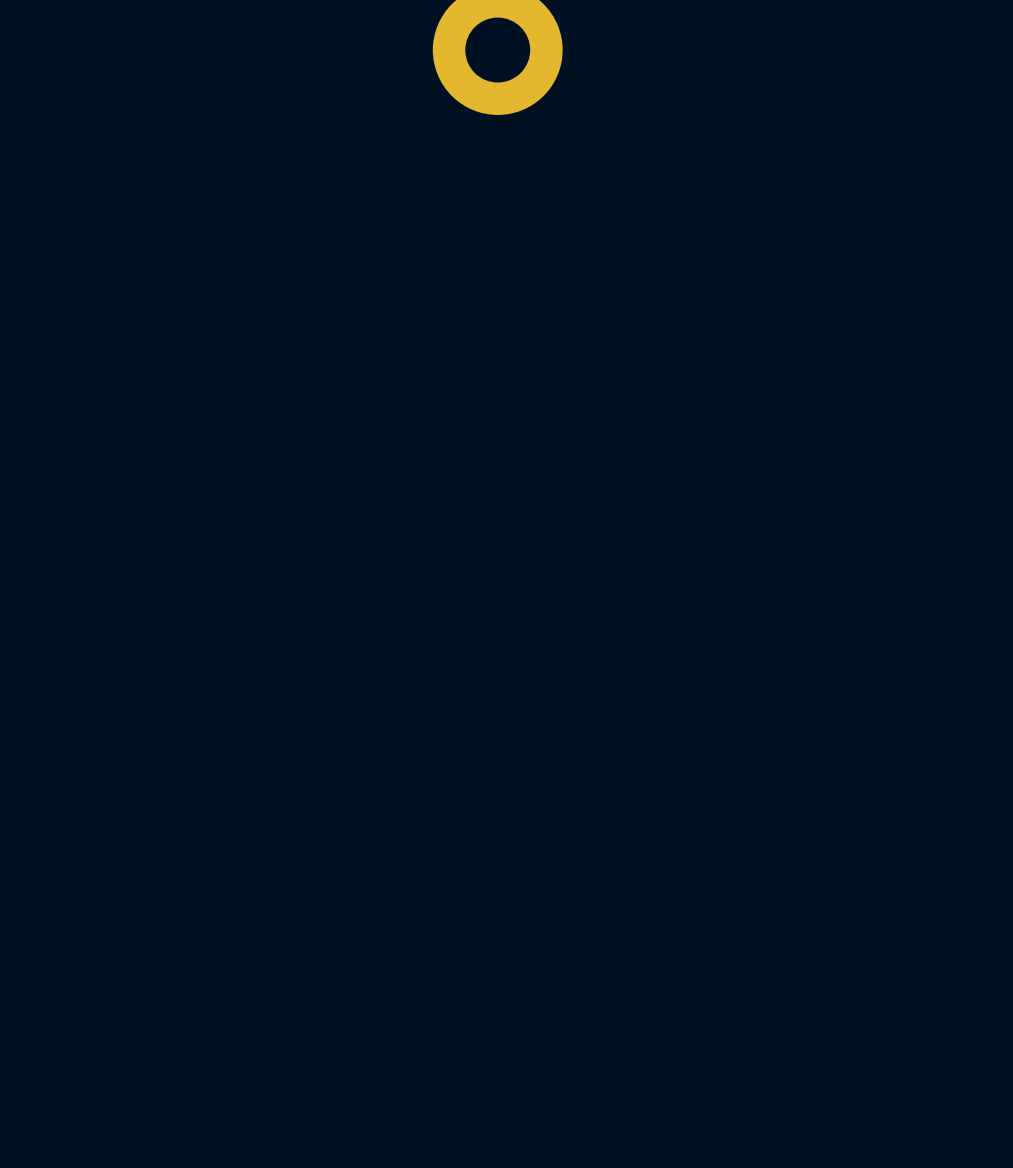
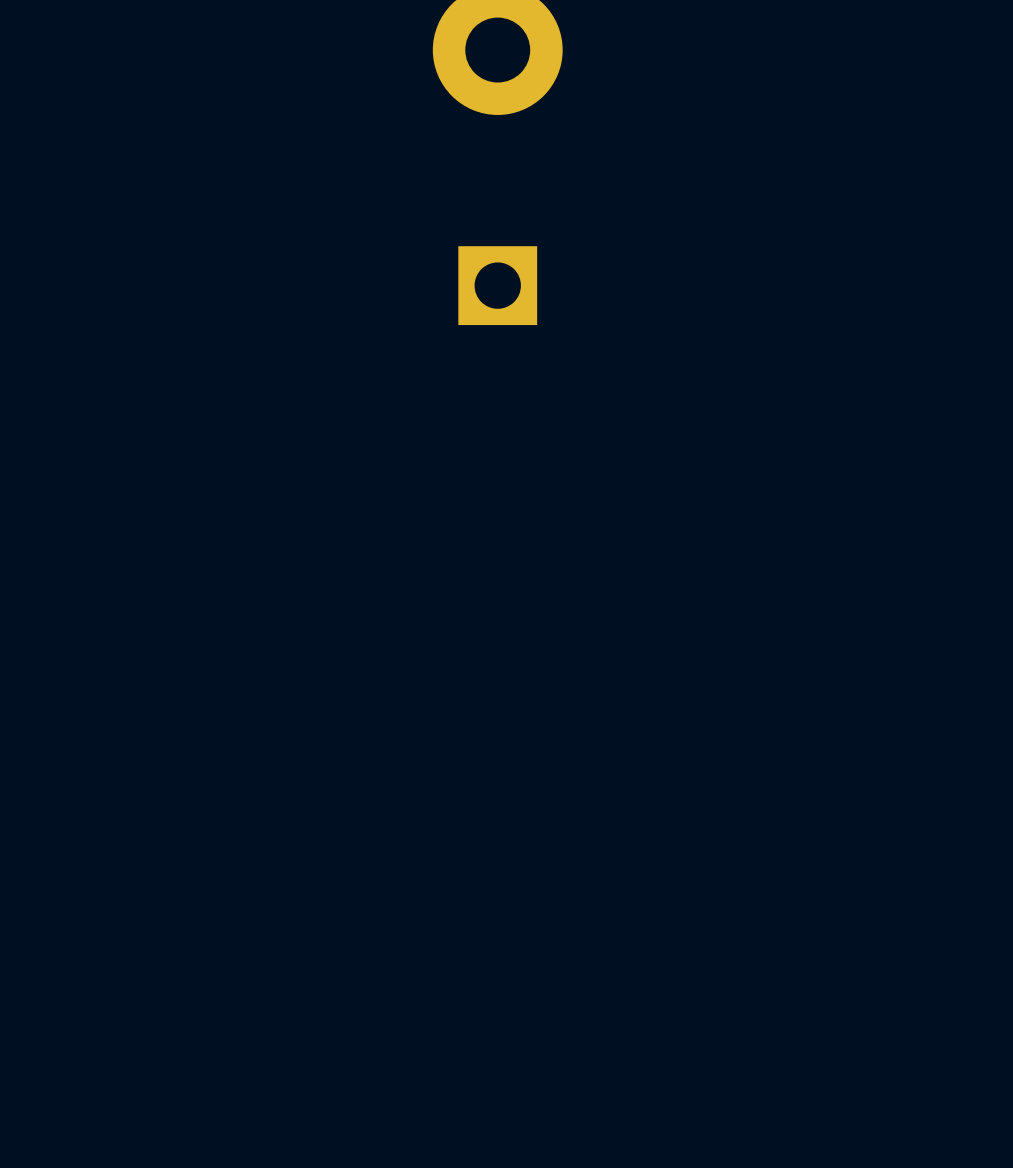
part: none -> (497, 285)

